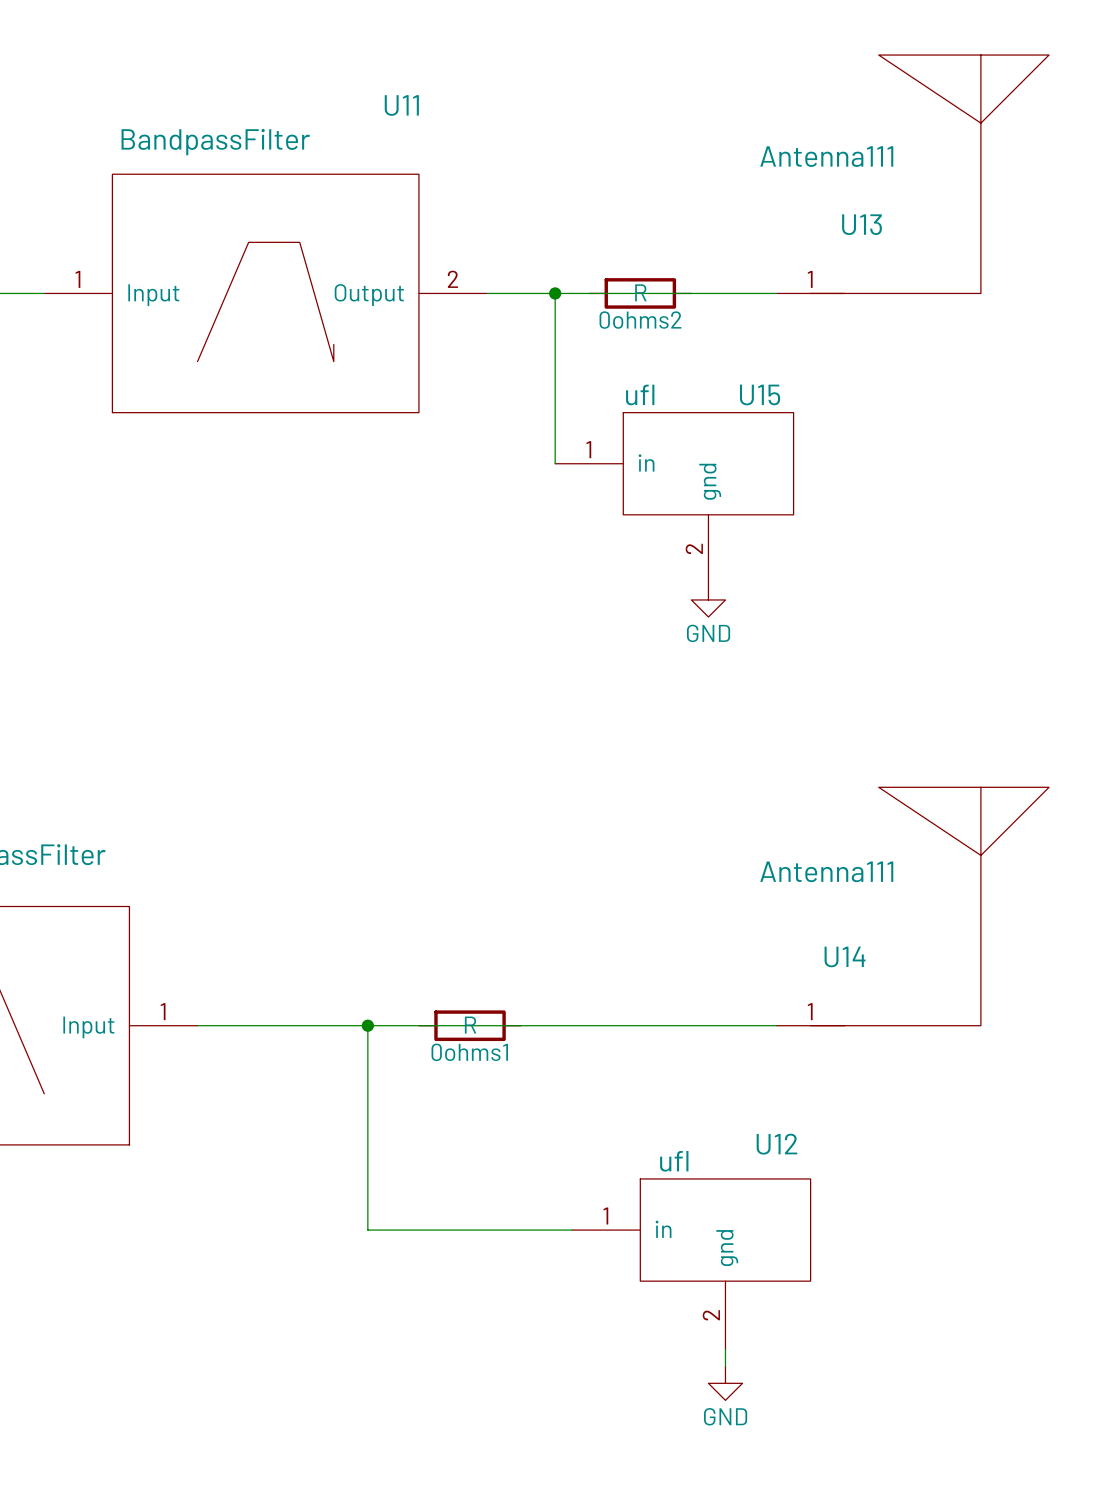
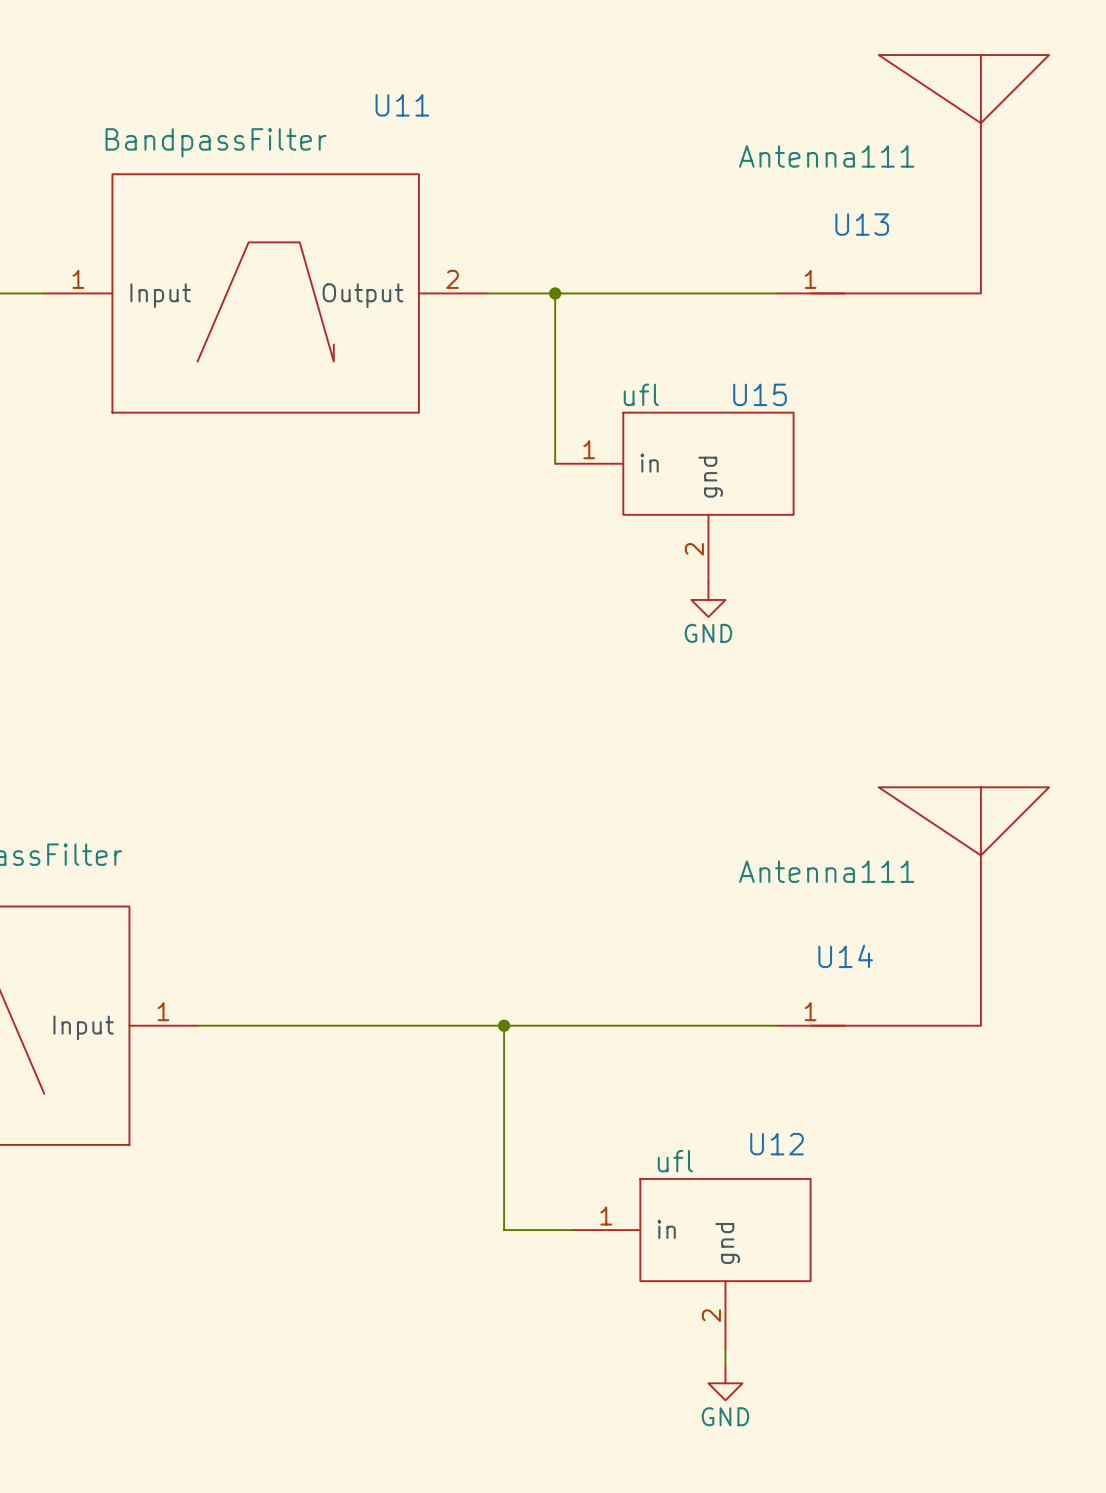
0ohms2: R (640, 293) -> none
wire: (367, 1025) (367, 1230) (504, 1230) -> (504, 1025) (504, 1230)
junction: (367, 1025) -> none
0ohms1: R (470, 1025) -> none
junction: none -> (504, 1025)

